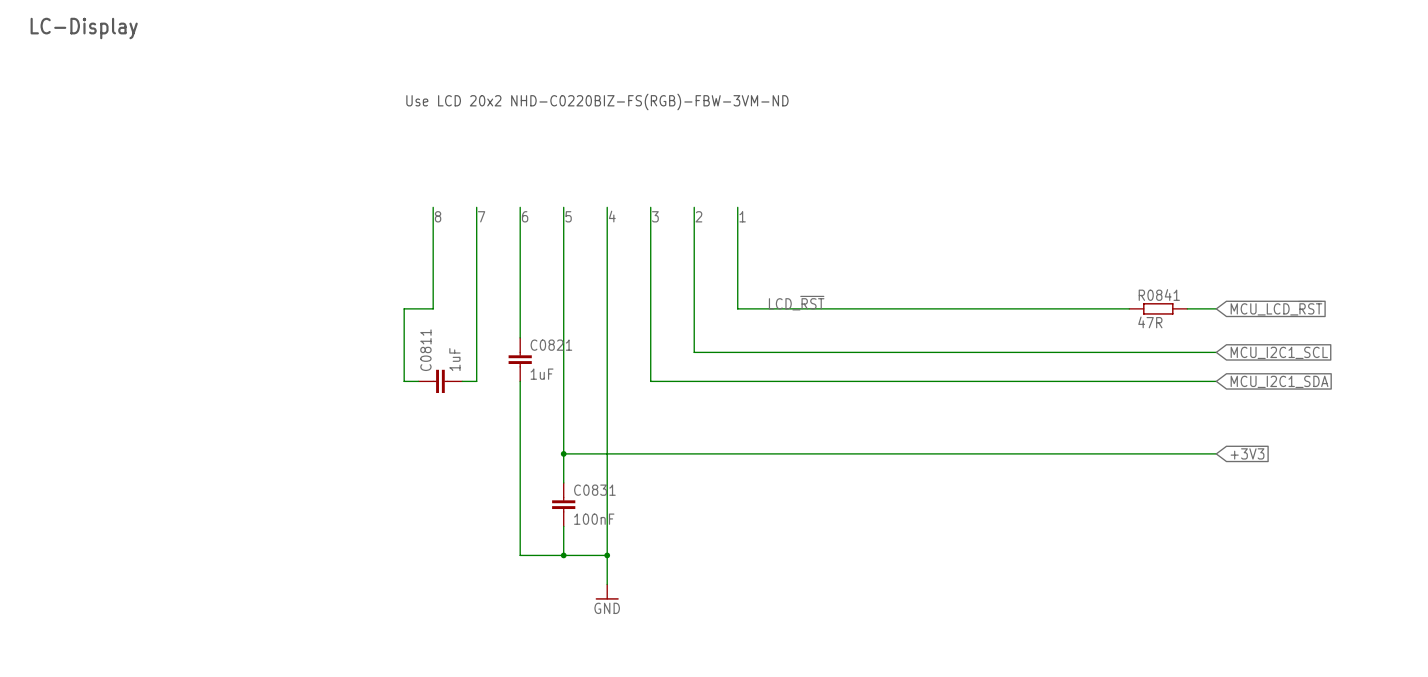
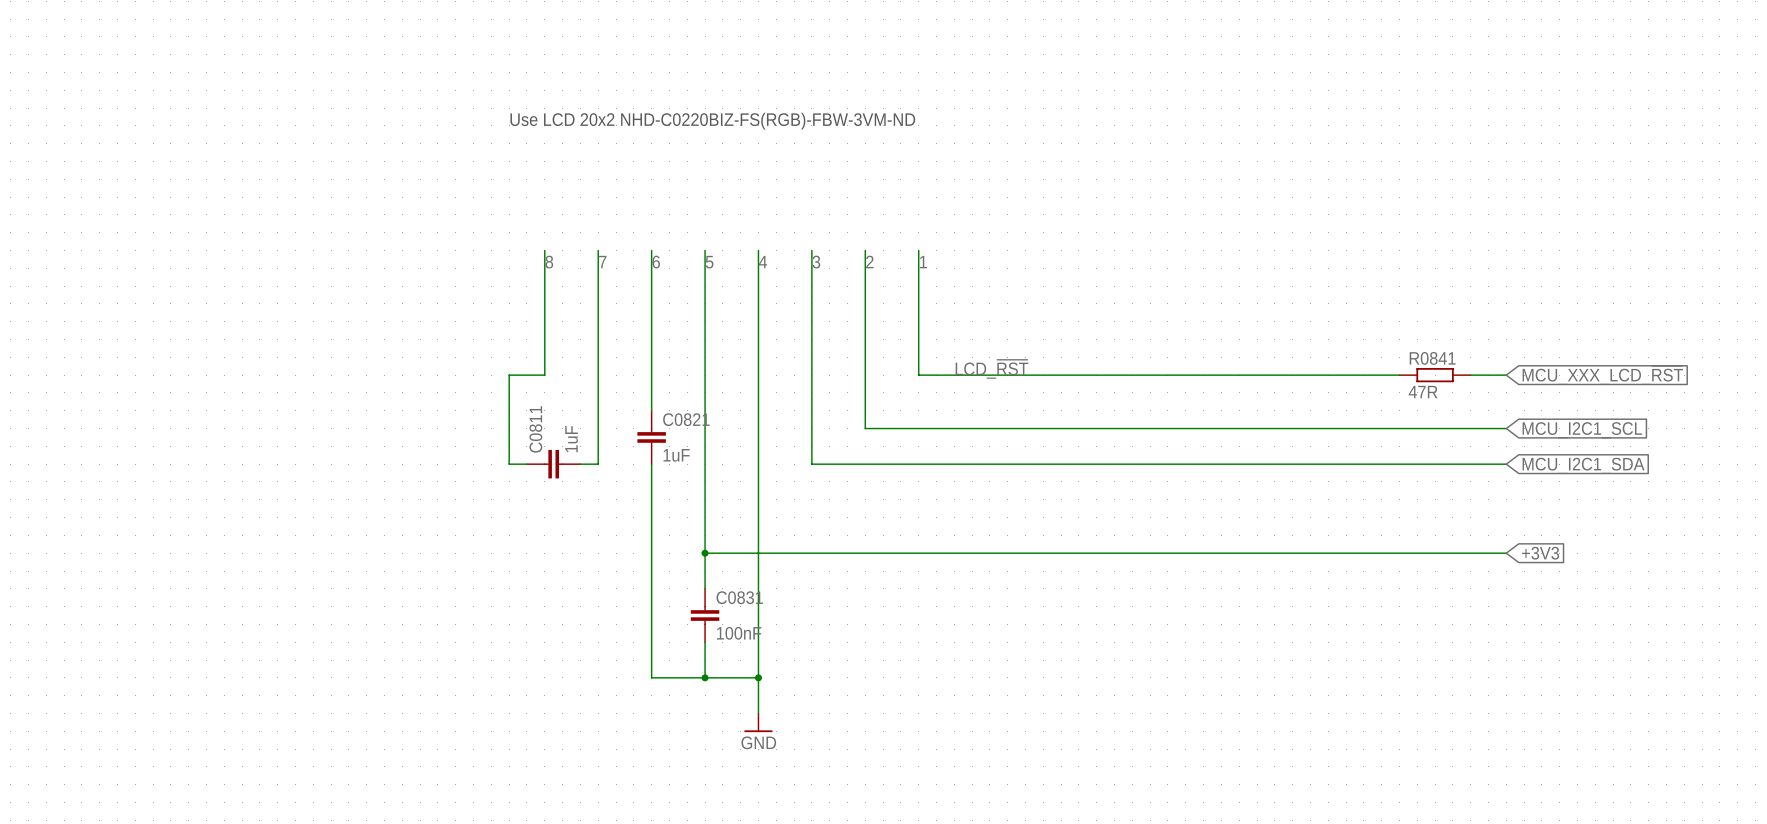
text: LC-Display (84, 28) -> none
global label: MCU_LCD_~{RST} (1276, 308) -> MCU_XXX_LCD_~{RST} (1602, 375)

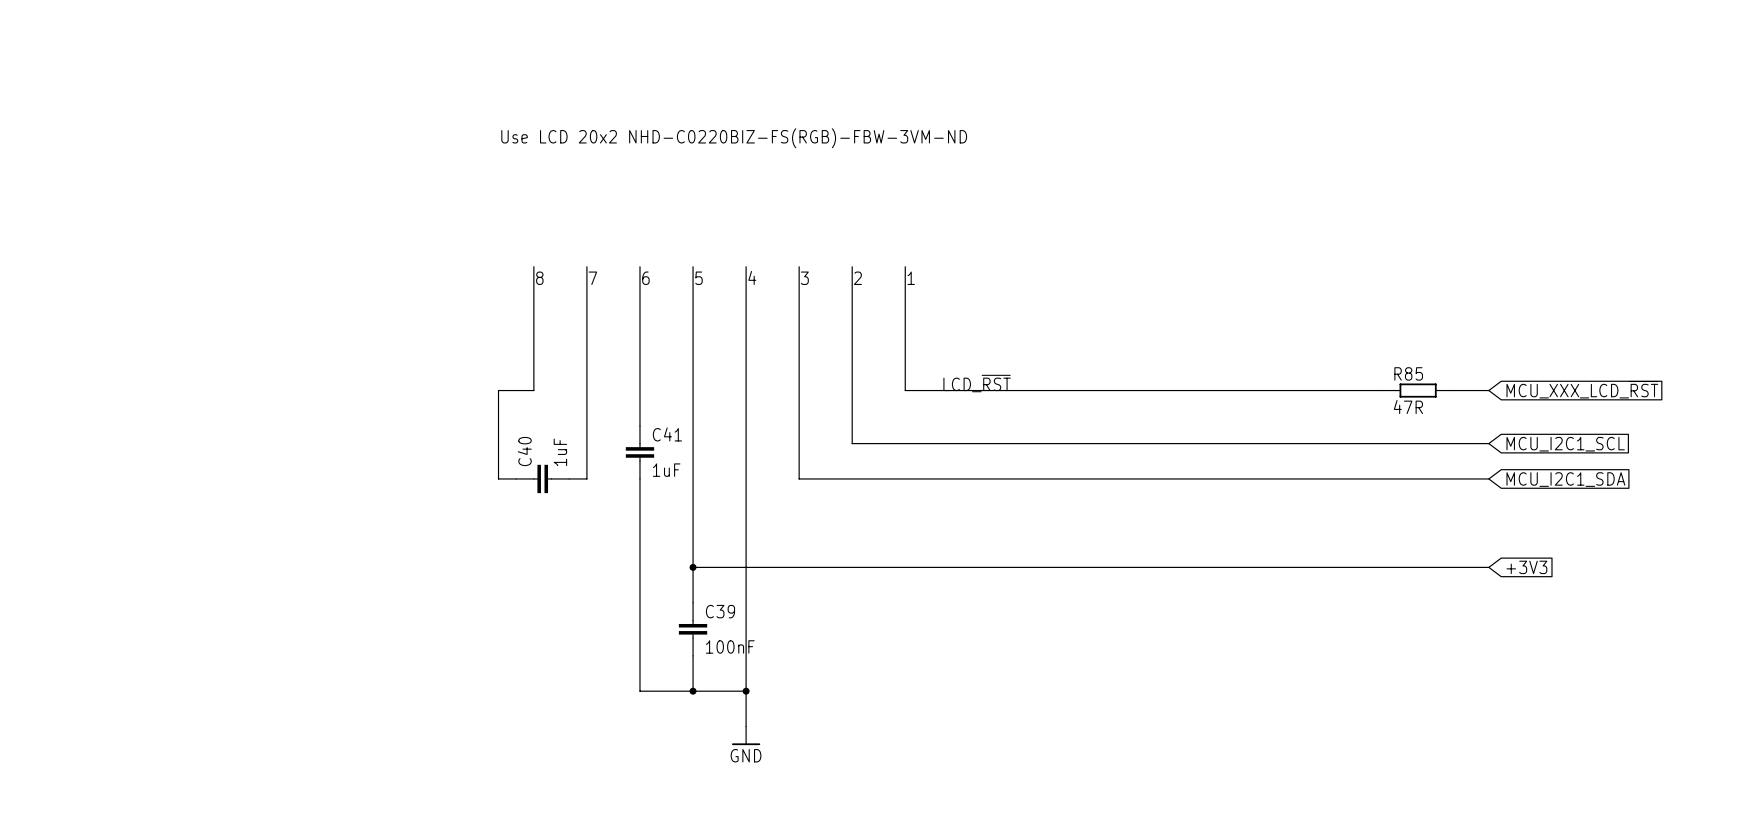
R0841 name: R0841 (1432, 358) -> R85 (1408, 373)
C0821 name: C0821 (686, 419) -> C41 (667, 434)
C0811 name: C0811 (535, 429) -> C40 (524, 451)
C0831 name: C0831 (739, 597) -> C39 (720, 611)

